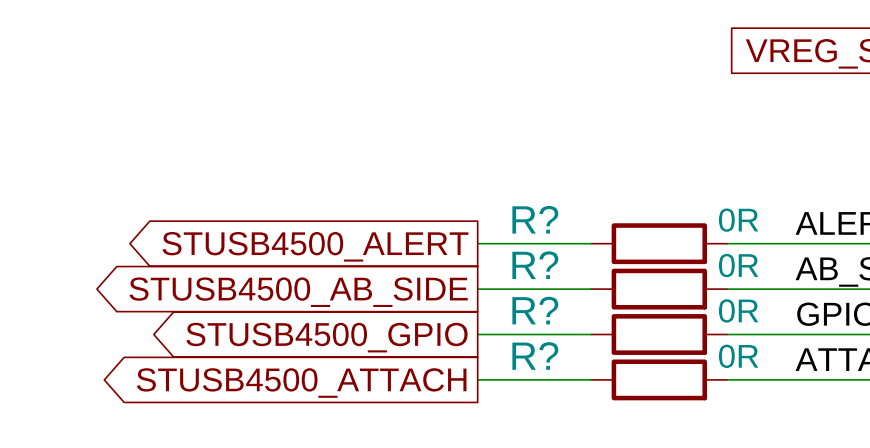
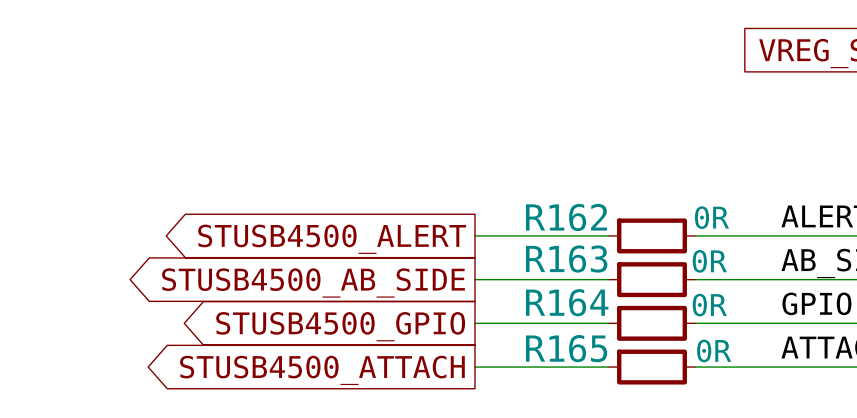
R?: (659, 243) -> none
R162: none -> (652, 235)
R?: (659, 289) -> none
R163: none -> (652, 279)
R?: (659, 334) -> none
R164: none -> (652, 323)
R?: (659, 379) -> none
R165: none -> (652, 367)

